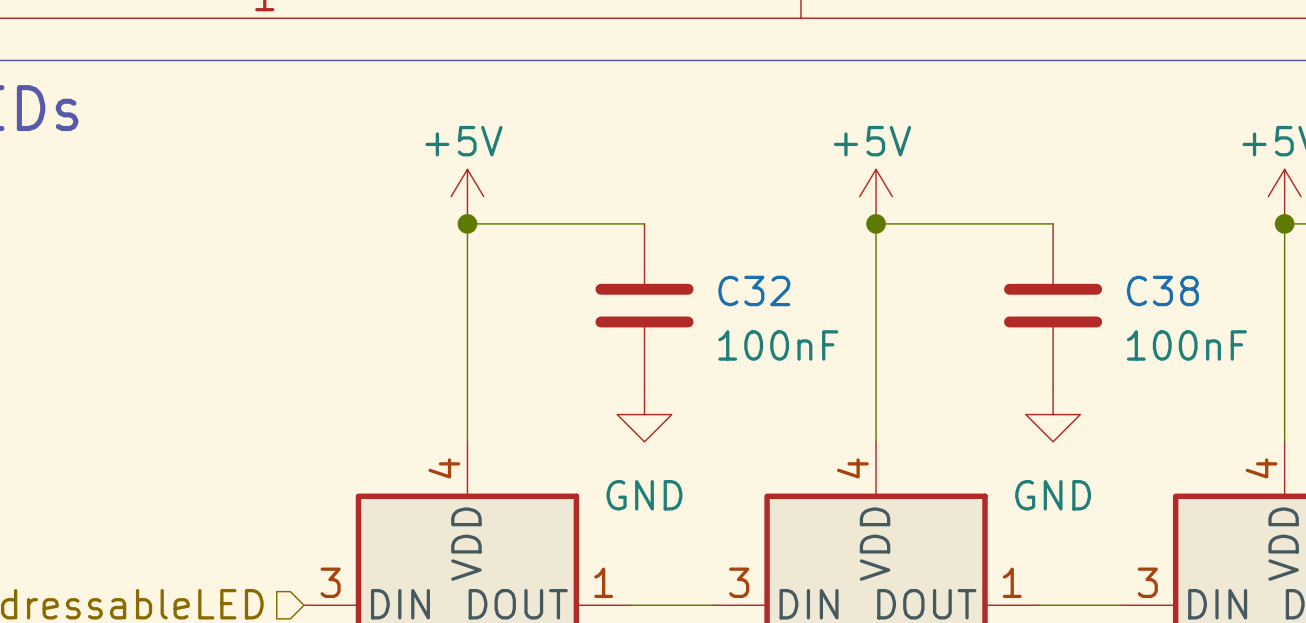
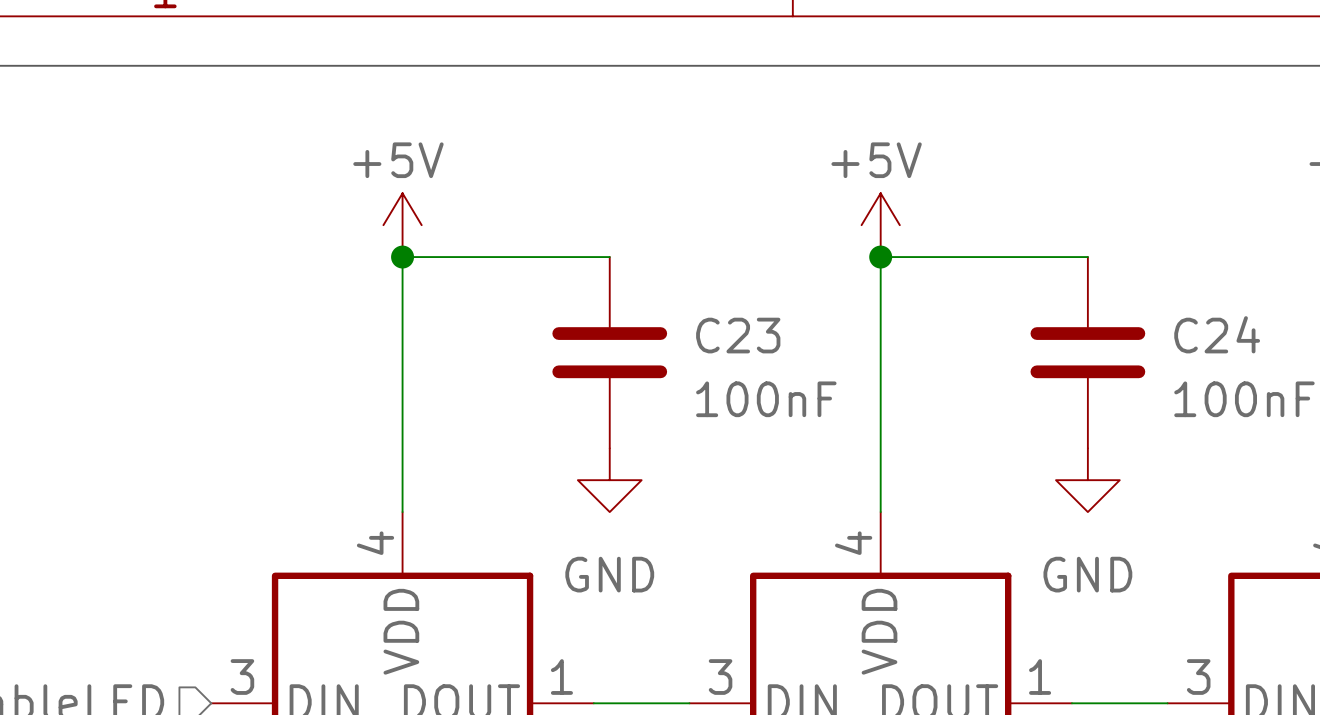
C32 name: C32 (754, 290) -> C23 (738, 335)
C38 name: C38 (1162, 290) -> C24 (1217, 334)

